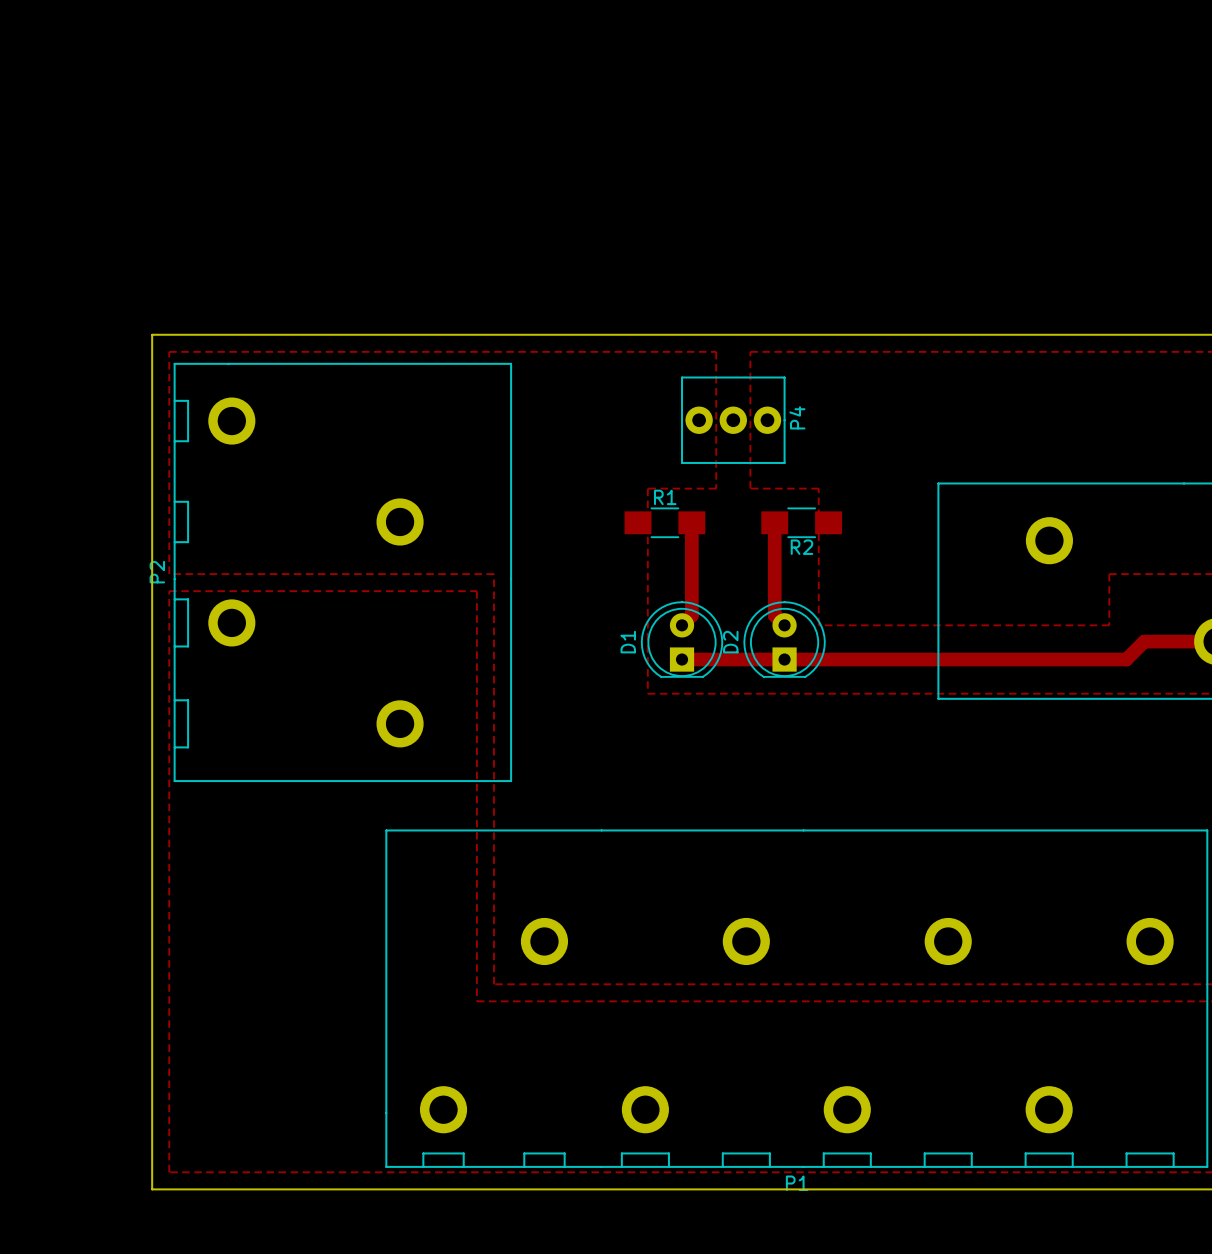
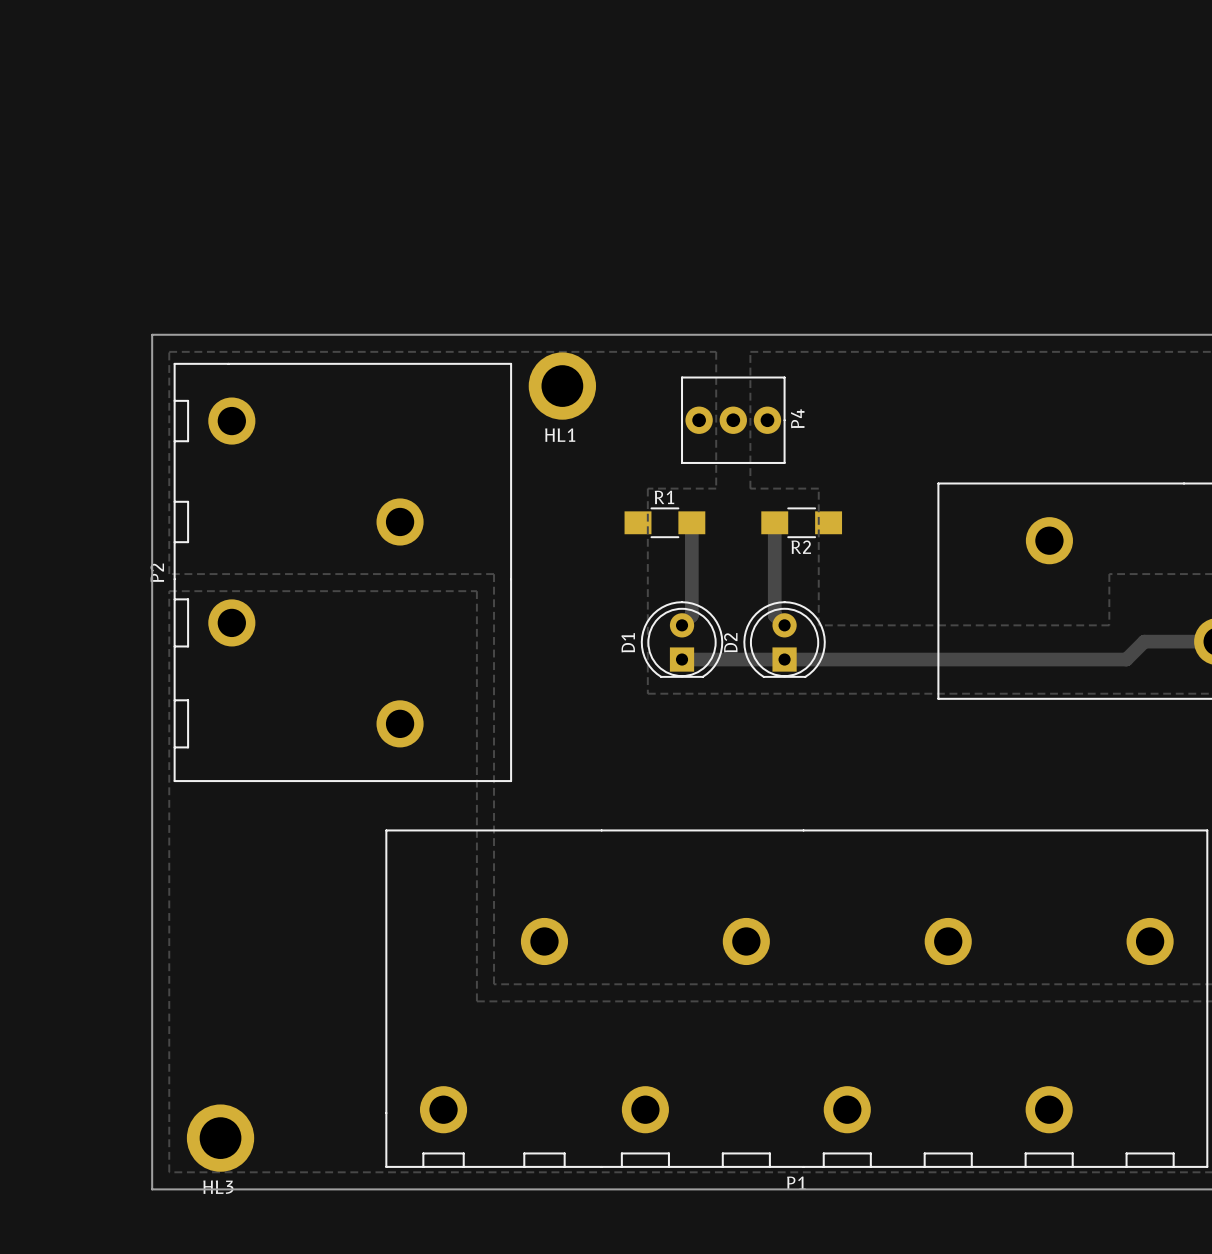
HL1: none -> (562, 386)
HL3: none -> (220, 1138)

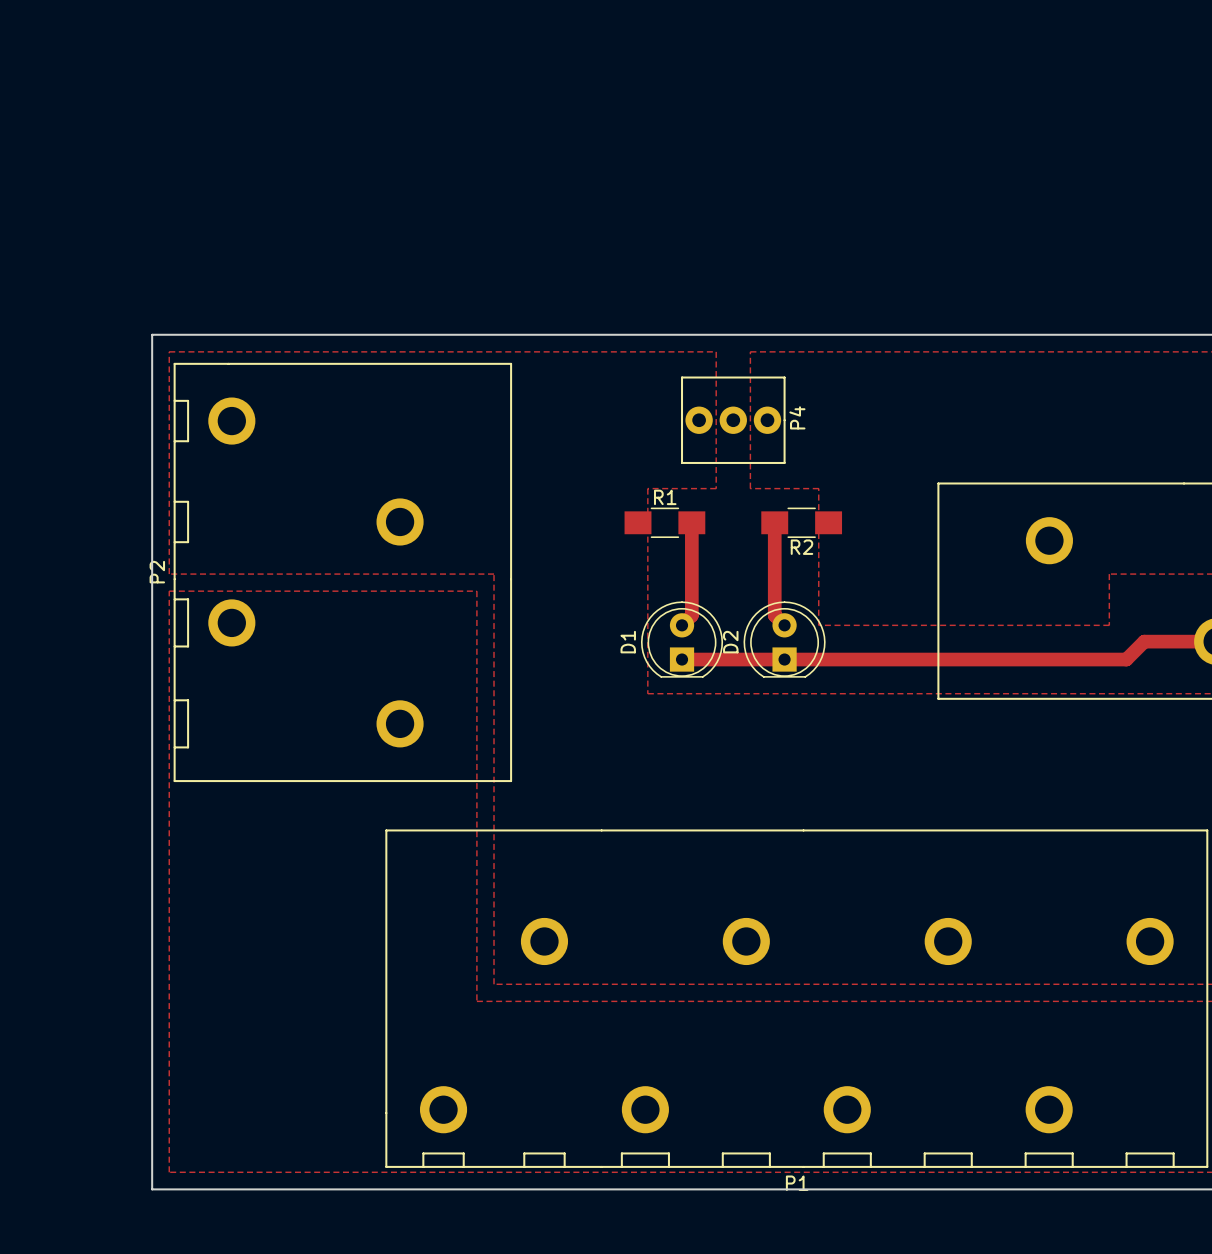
HL1: (562, 386) -> none
HL3: (220, 1138) -> none

